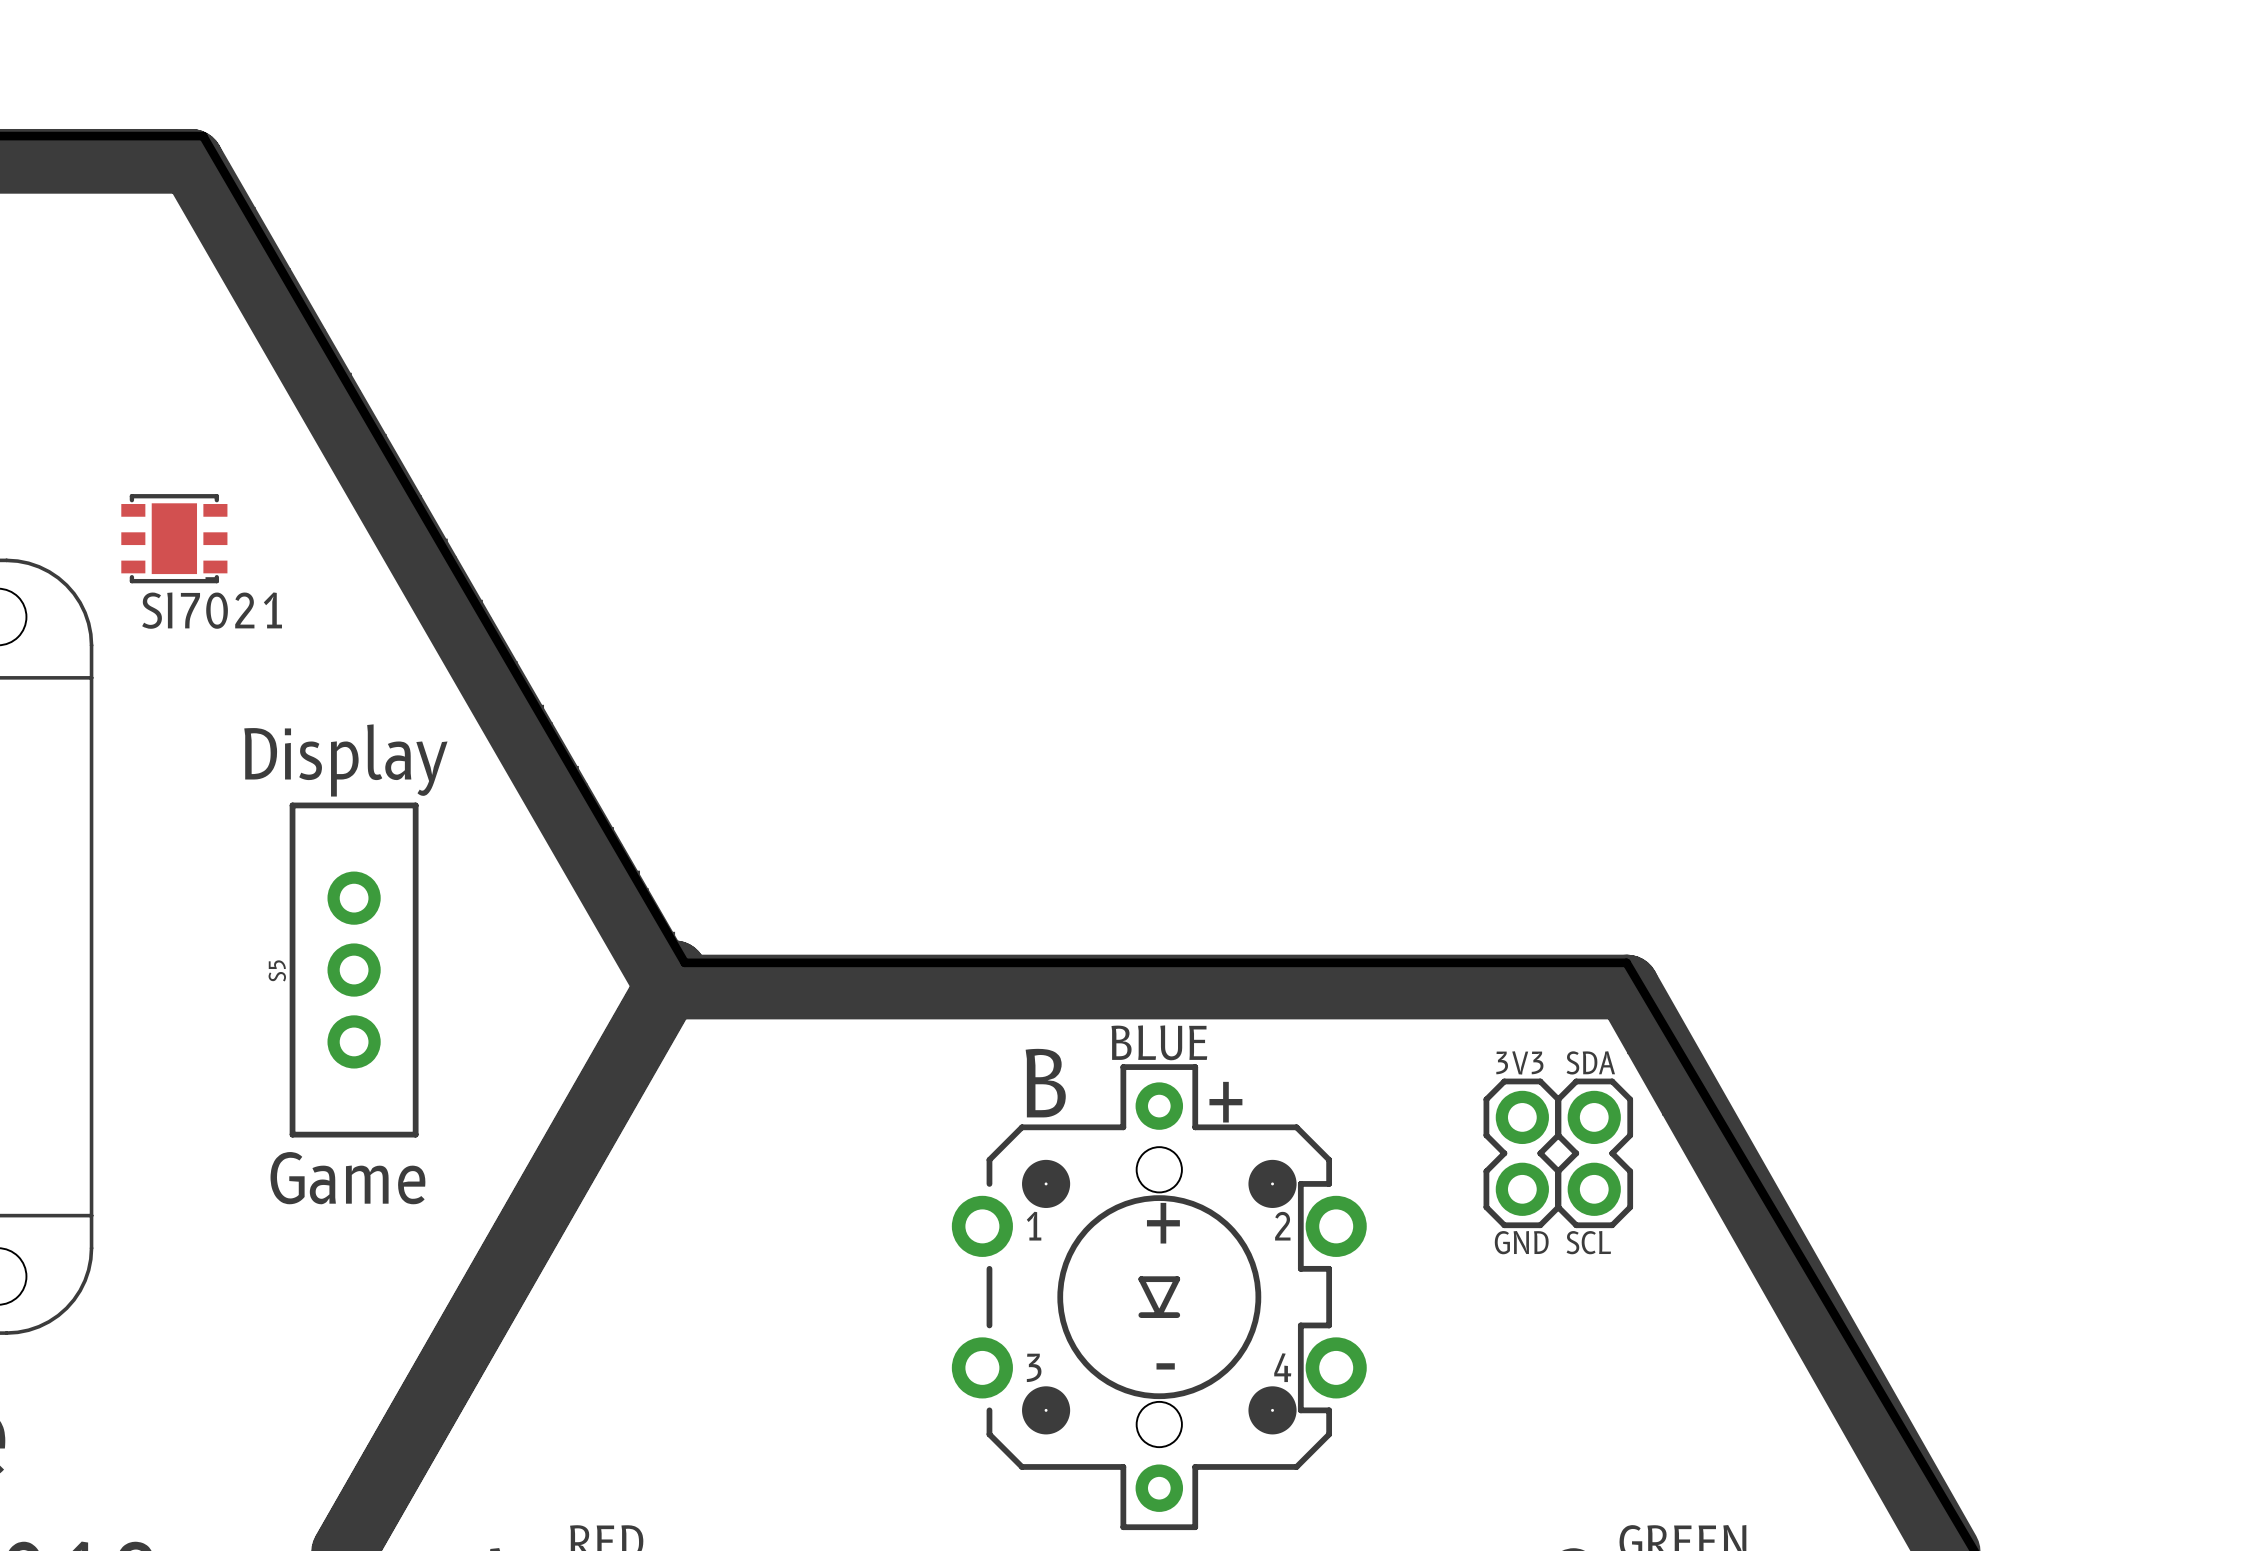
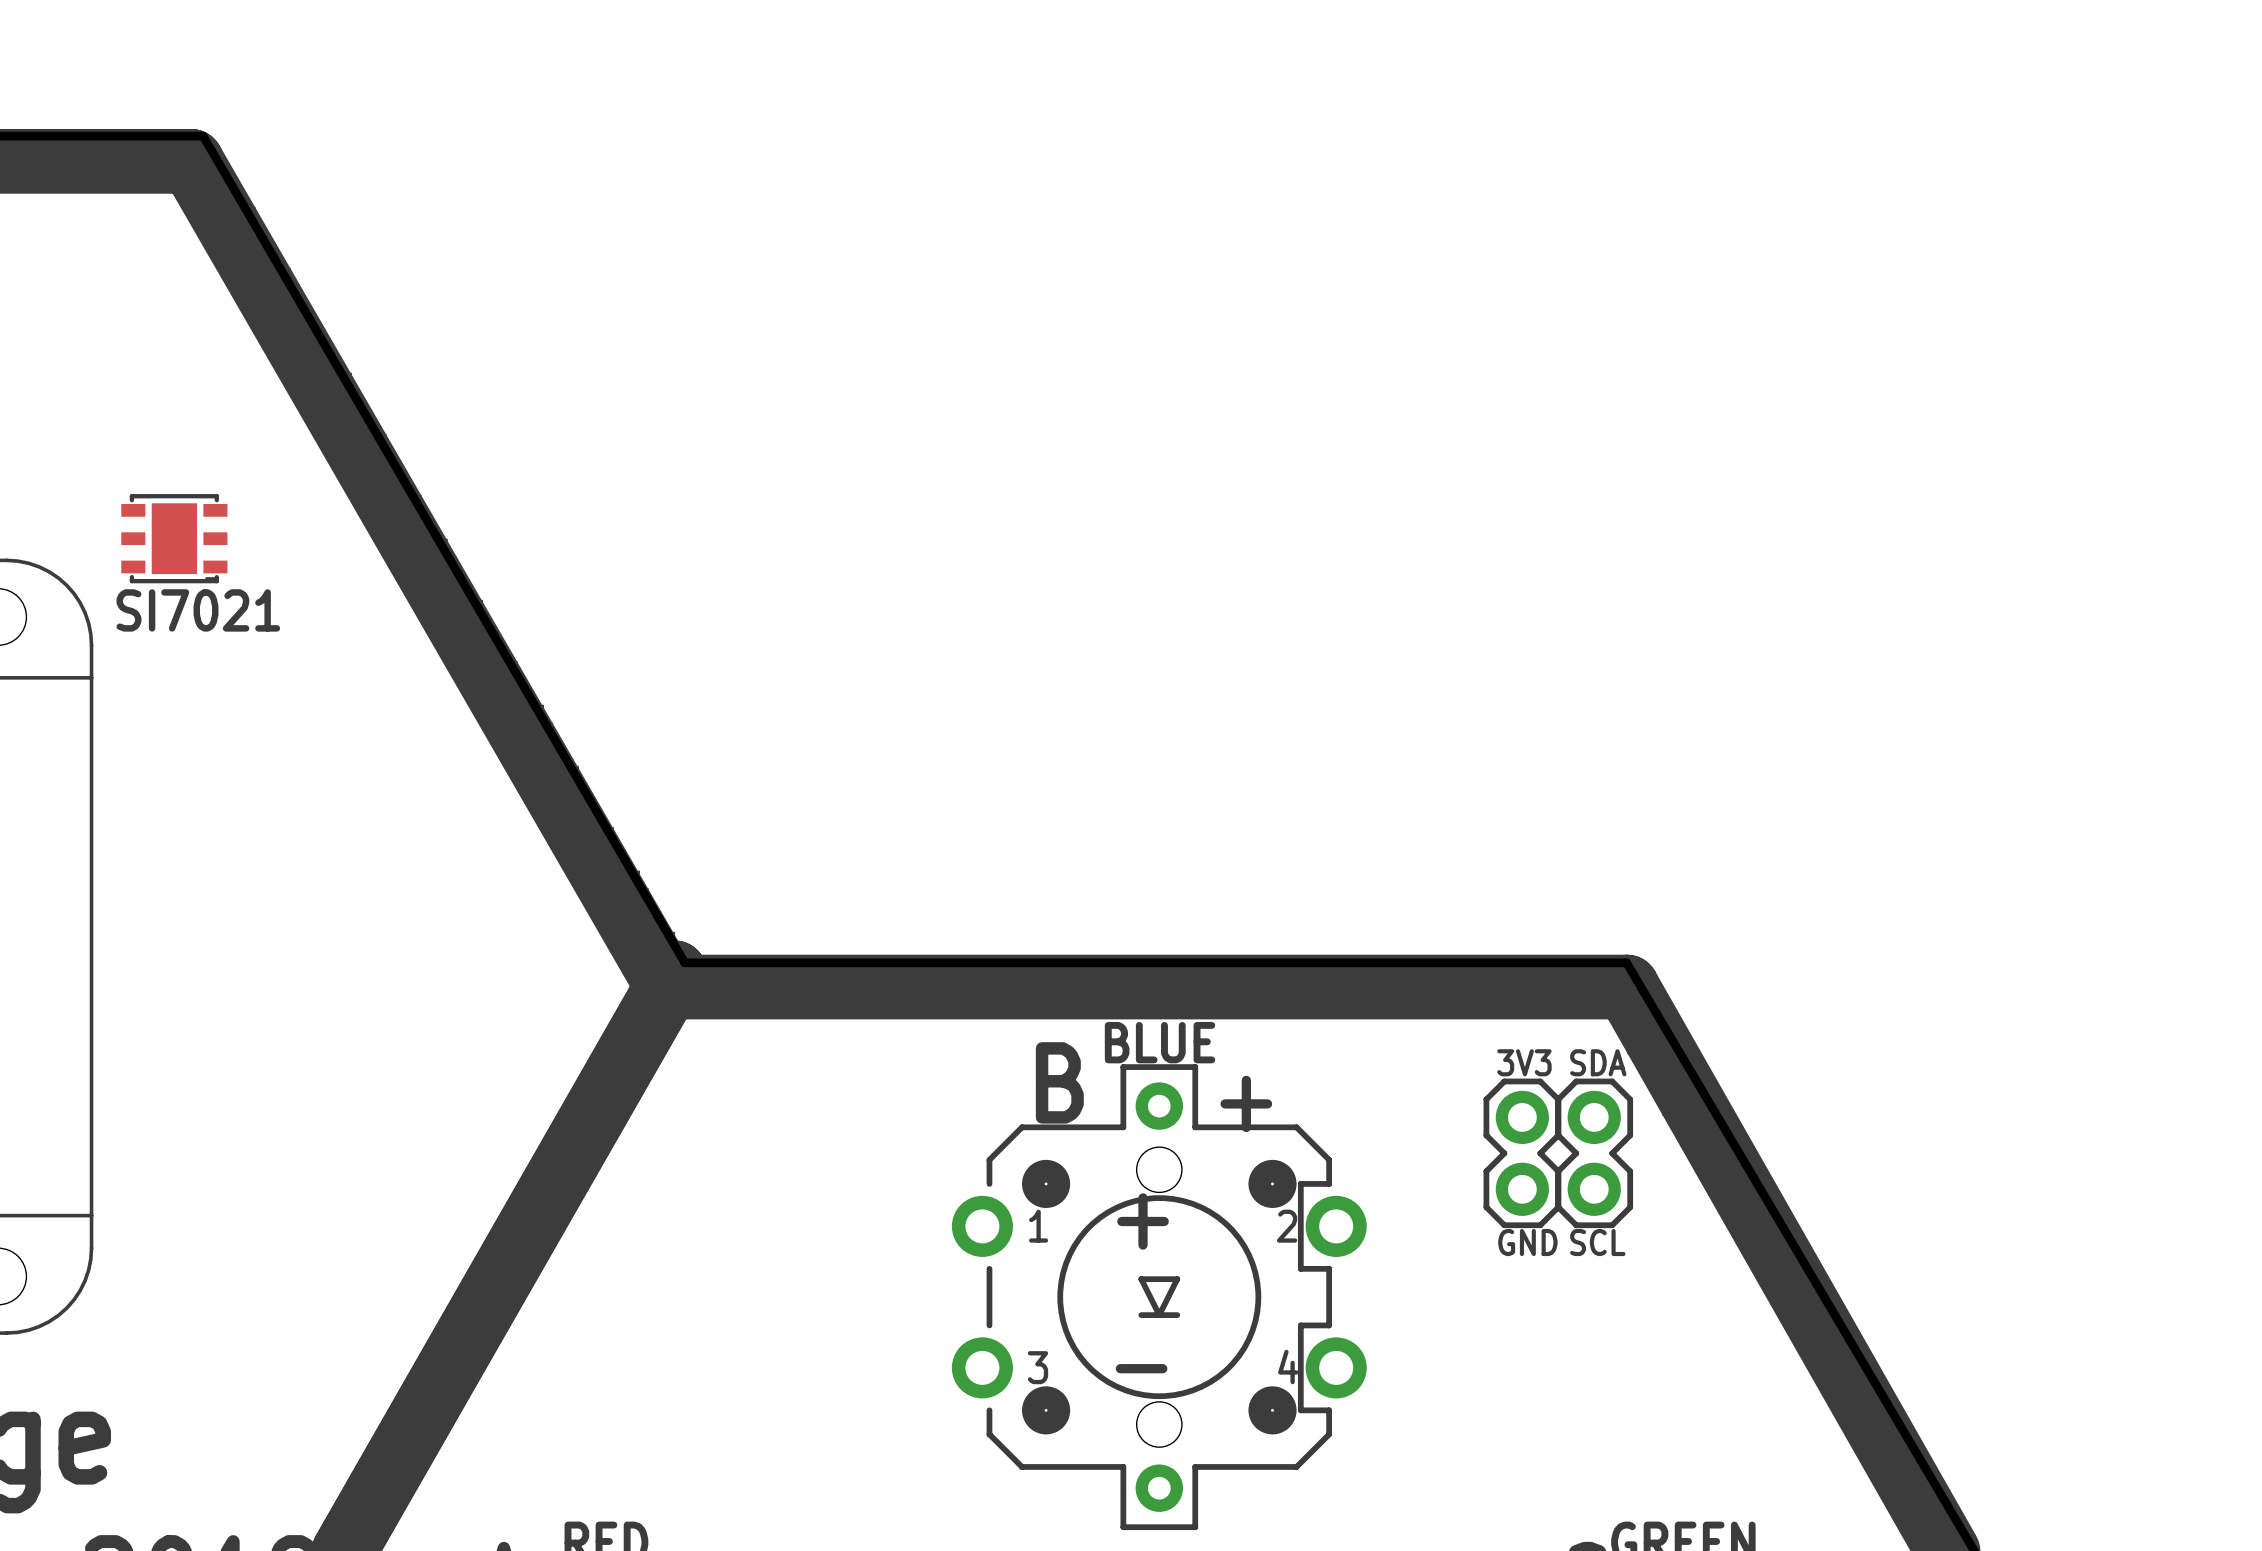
text: Display (345, 760) -> none
S5: (354, 970) -> none
text: Game (347, 1178) -> none

